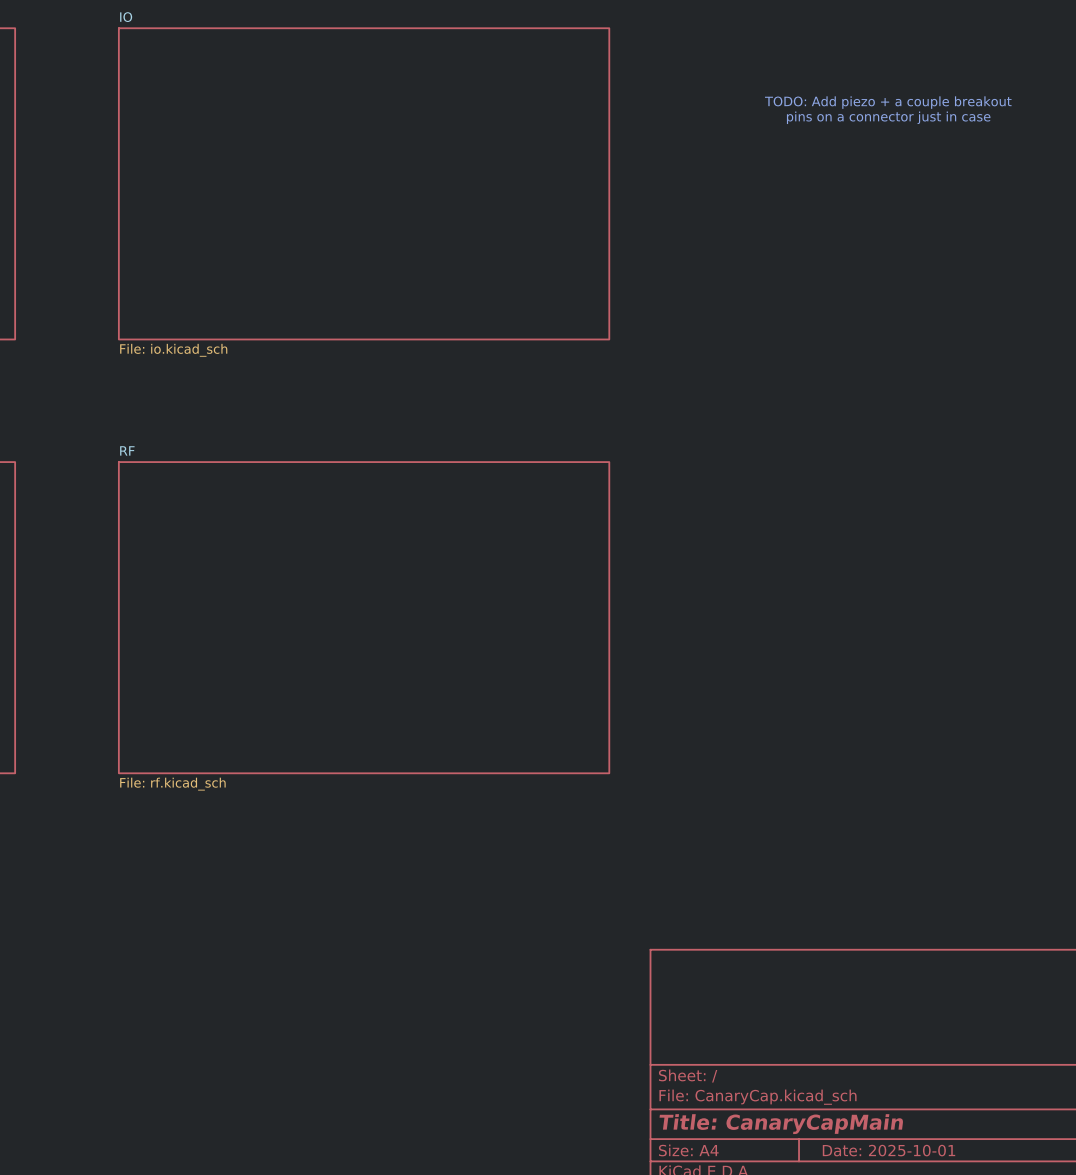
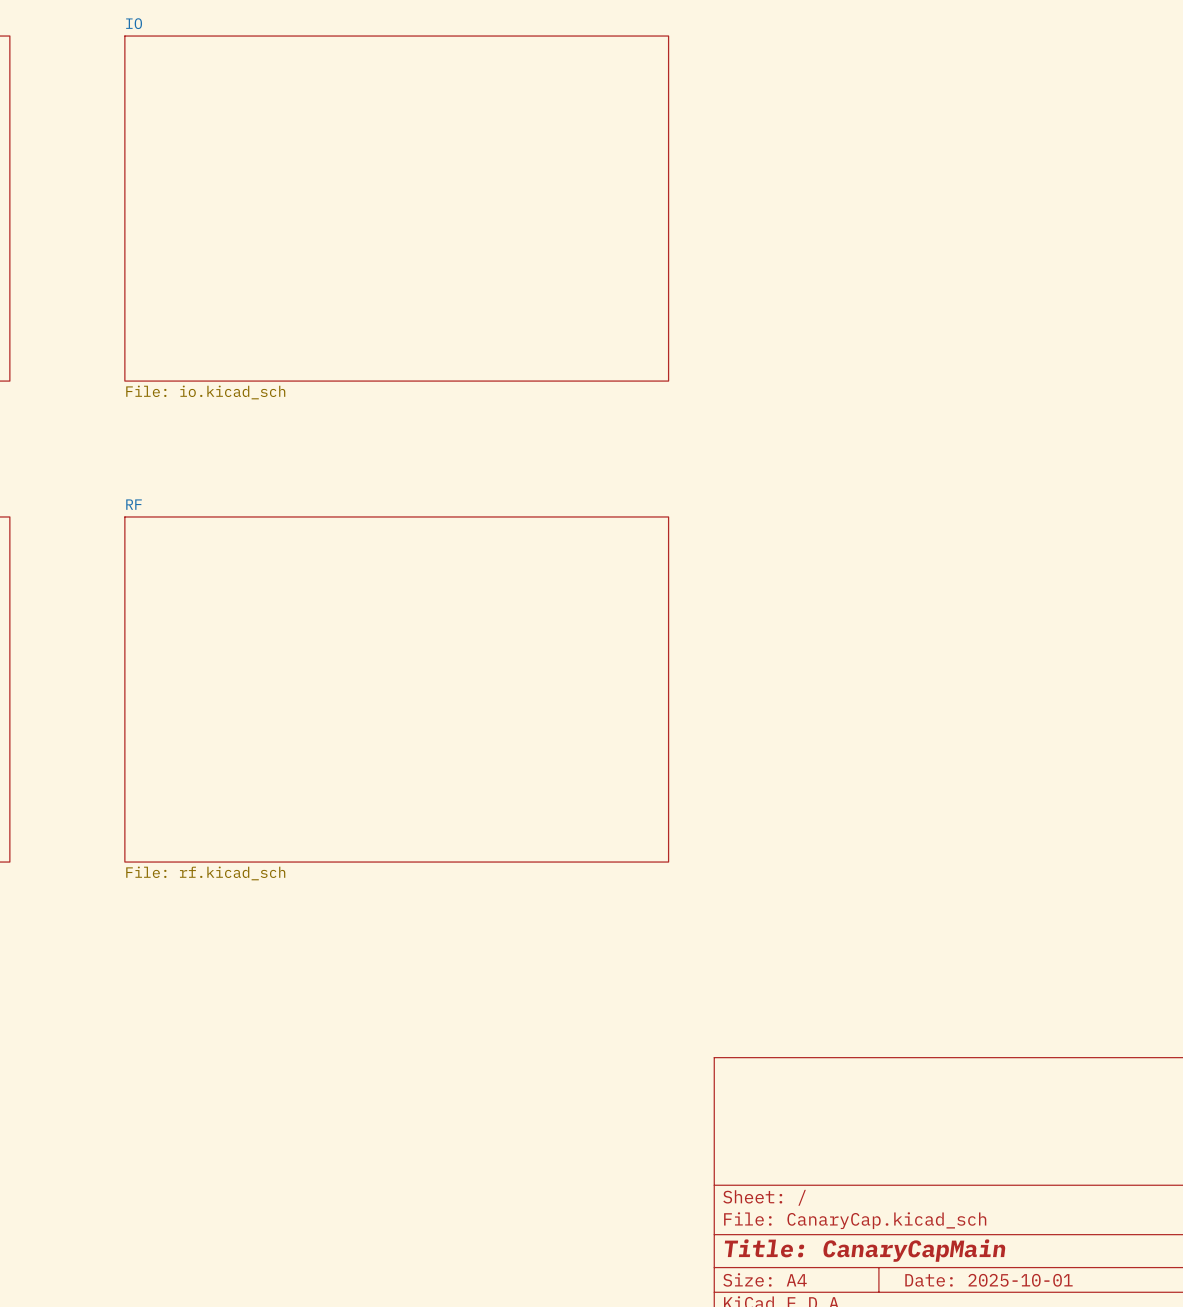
text: TODO: Add piezo + a couple breakout (888, 102) -> none
text: pins on a connector just in case (888, 117) -> none

